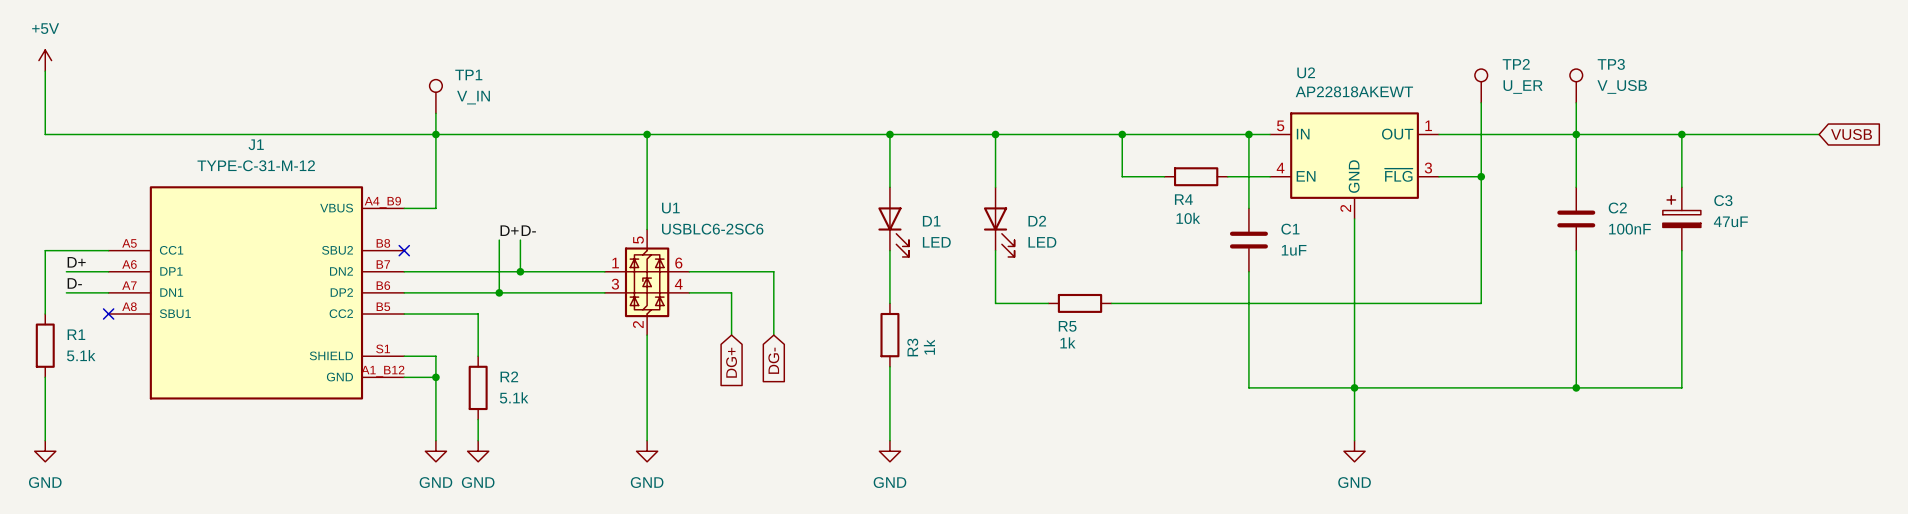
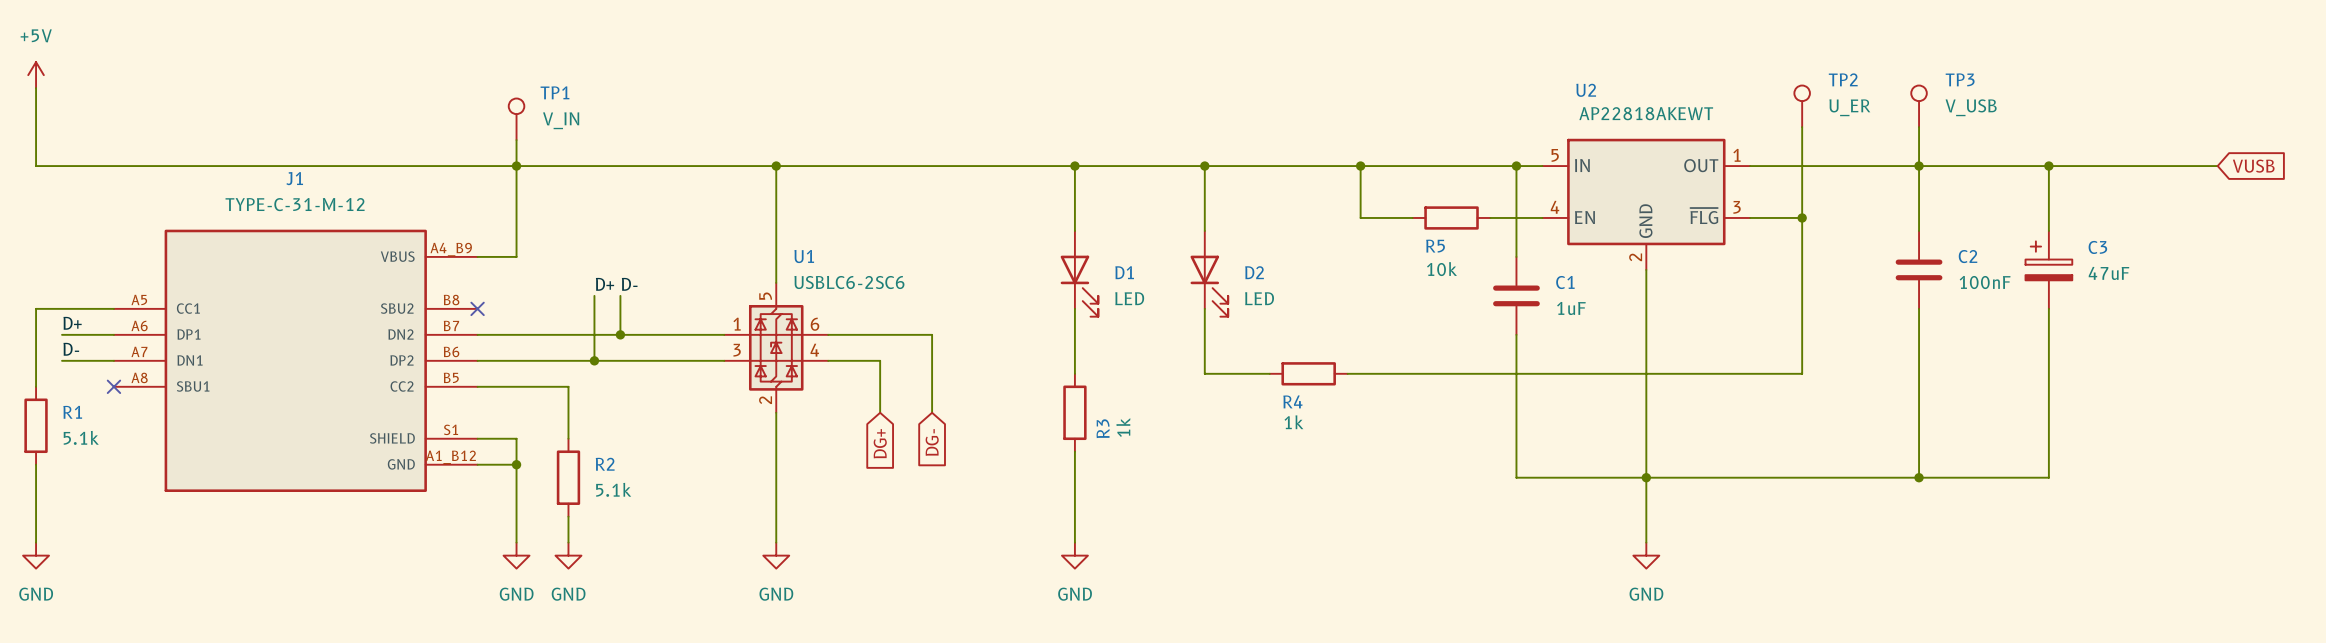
R4 name: R4 (1183, 199) -> R5 (1435, 246)
R5 name: R5 (1067, 326) -> R4 (1292, 401)

